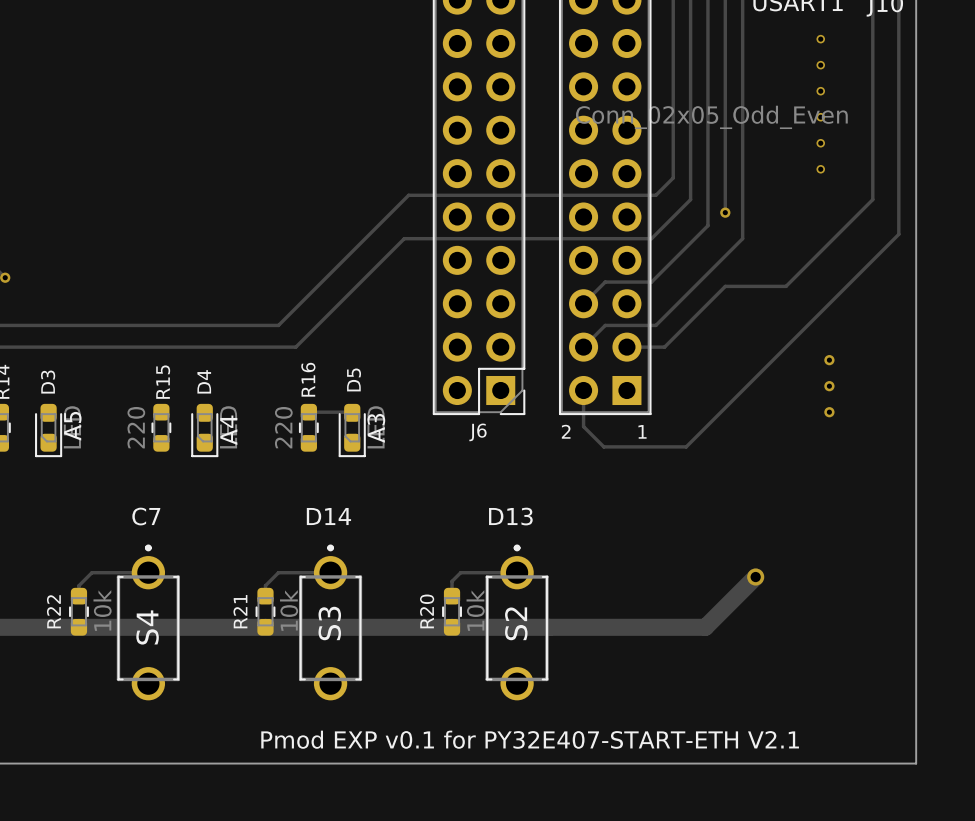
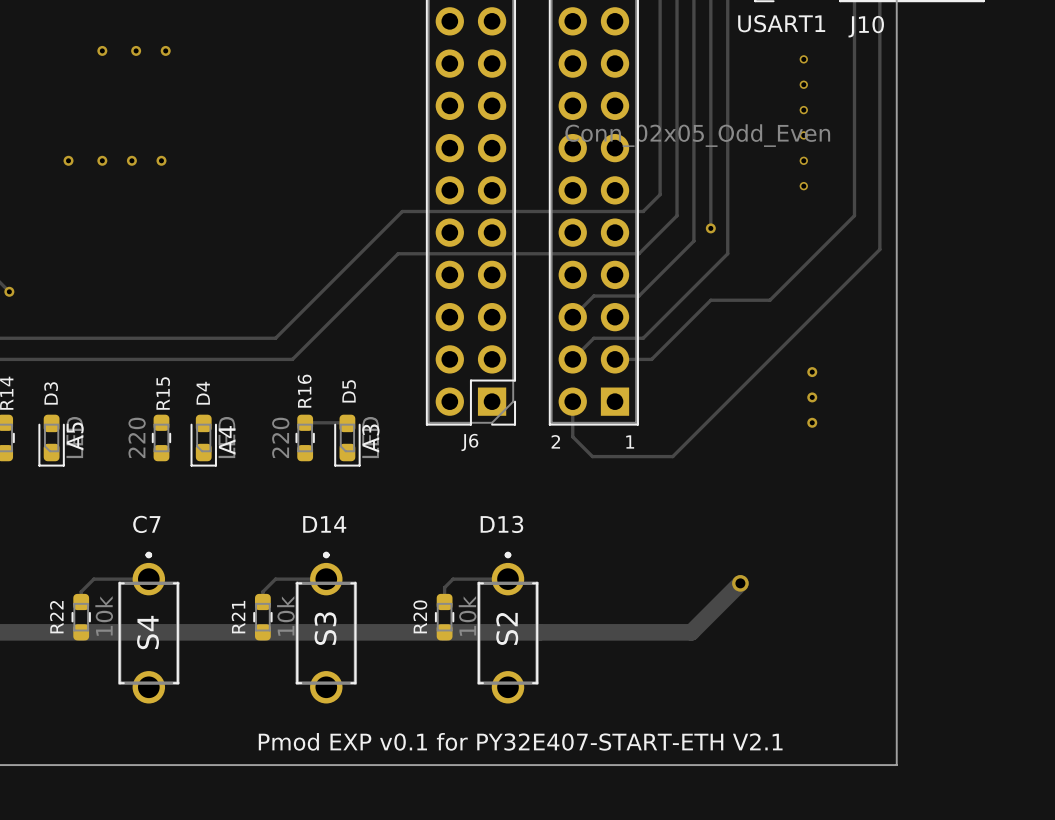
via: none -> (102, 50)
via: none -> (136, 50)
via: none -> (165, 50)
via: none -> (68, 160)
via: none -> (102, 160)
via: none -> (131, 160)
via: none -> (161, 160)

